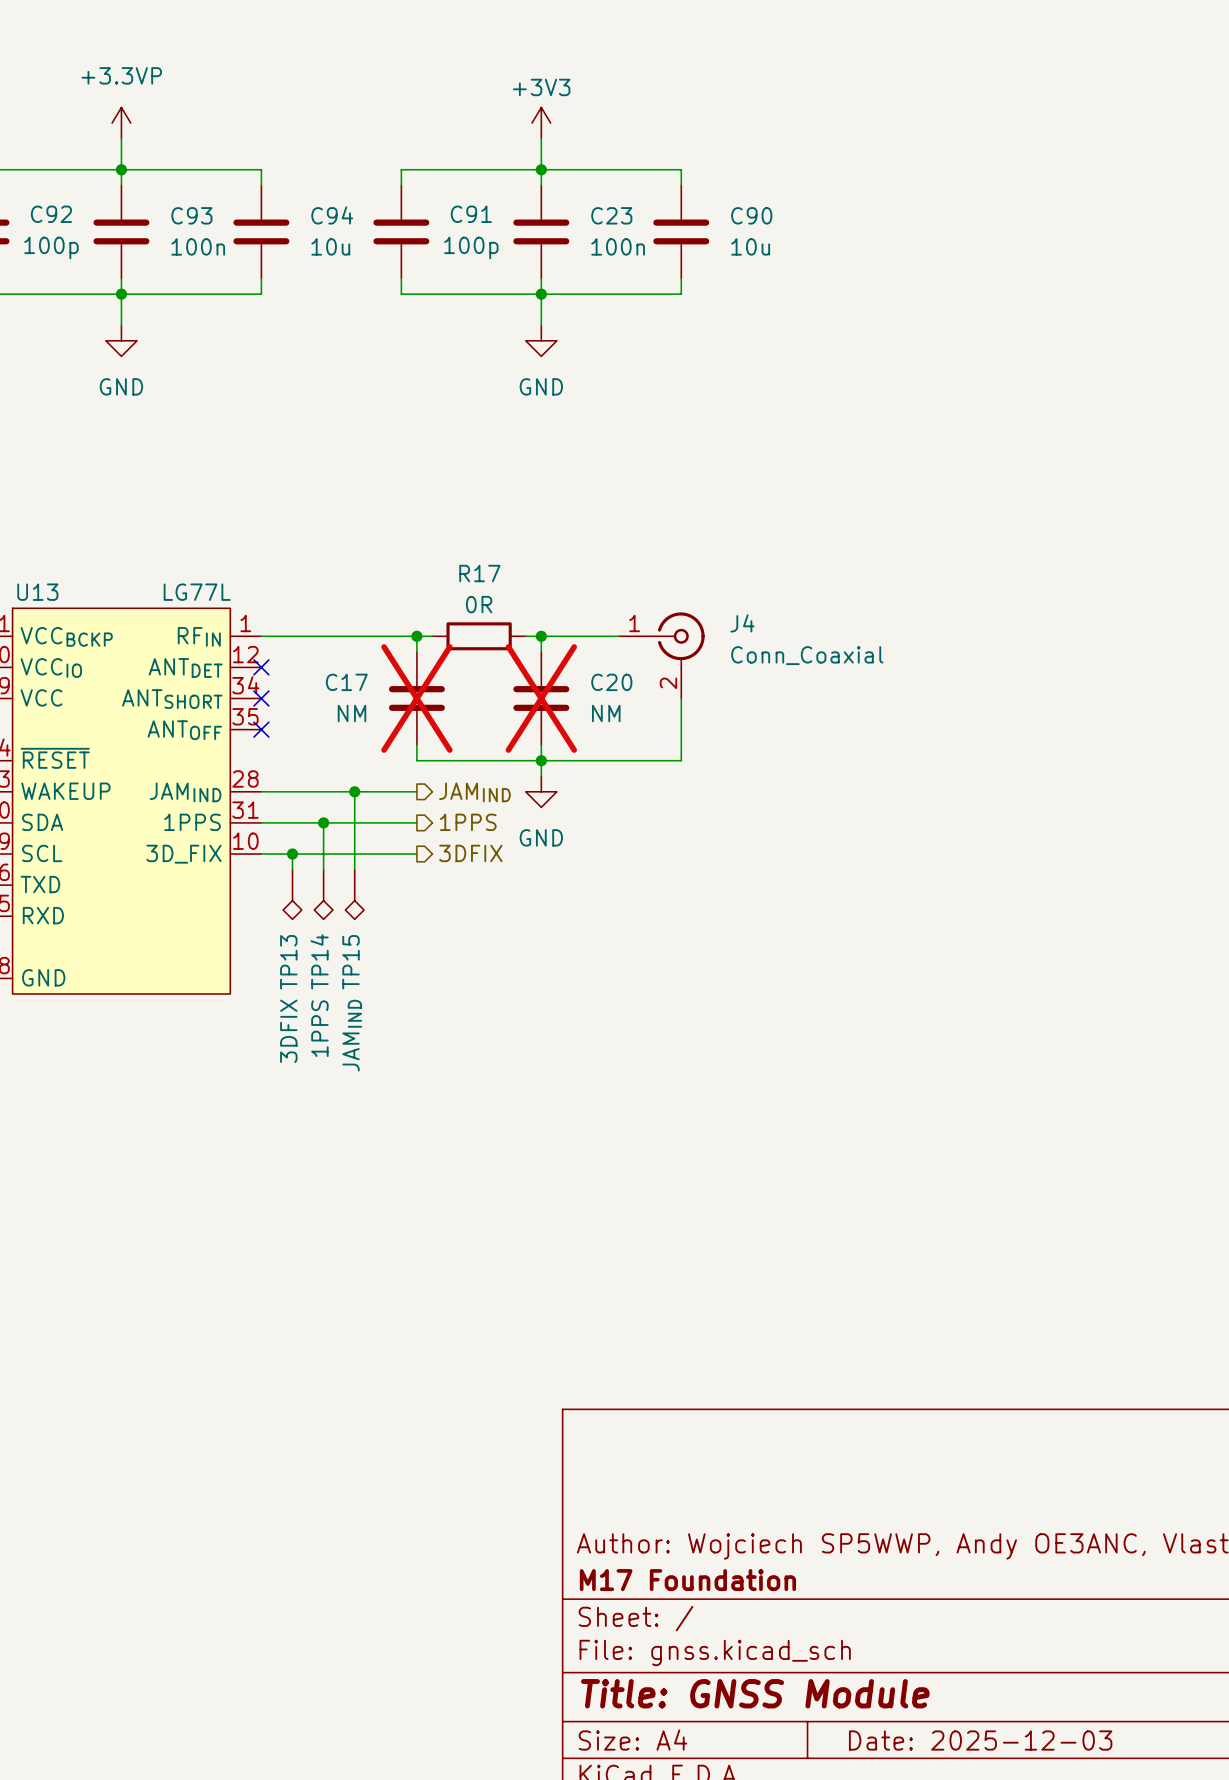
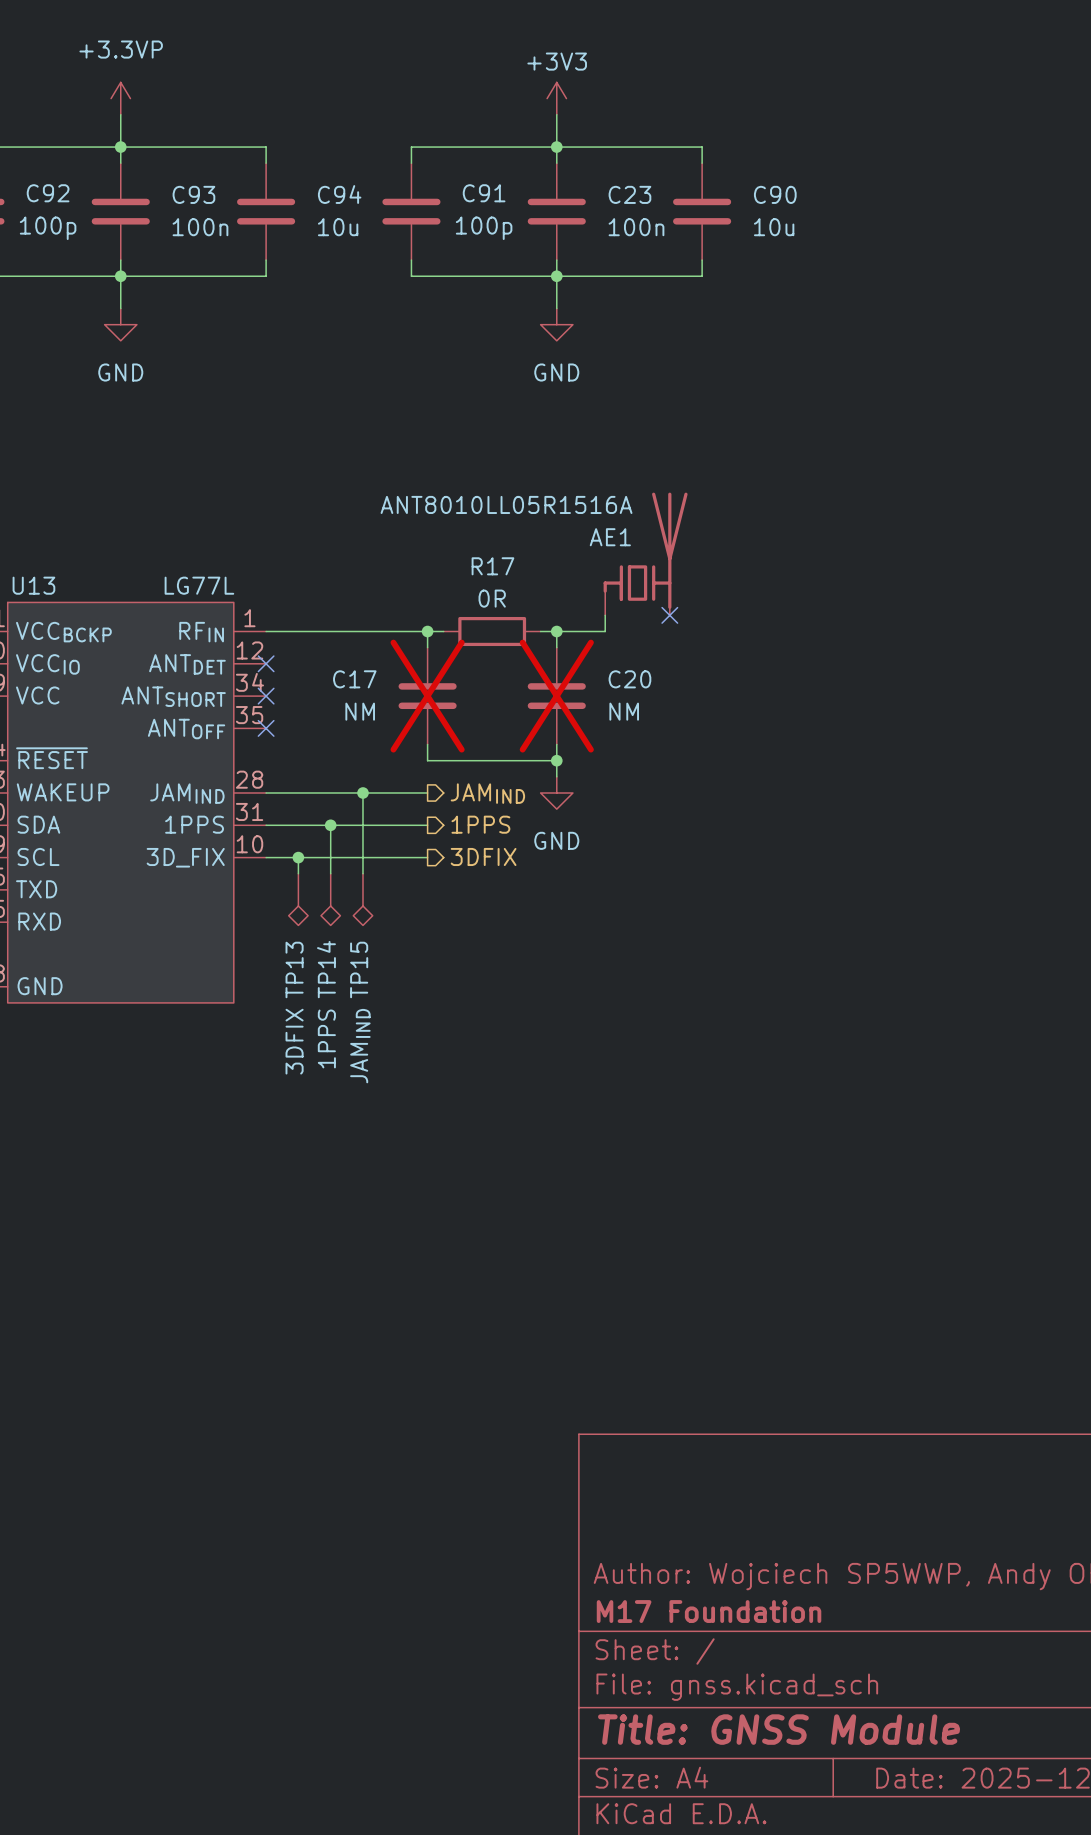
AE1: none -> ANT8010LL05R1516A (645, 553)
no-connect mark: none -> (669, 615)
wire: (587, 636) (619, 636) -> (605, 631) (605, 615)
J4: Conn_Coaxial (661, 655) -> none
wire: (681, 698) (681, 760) (541, 760) -> none

